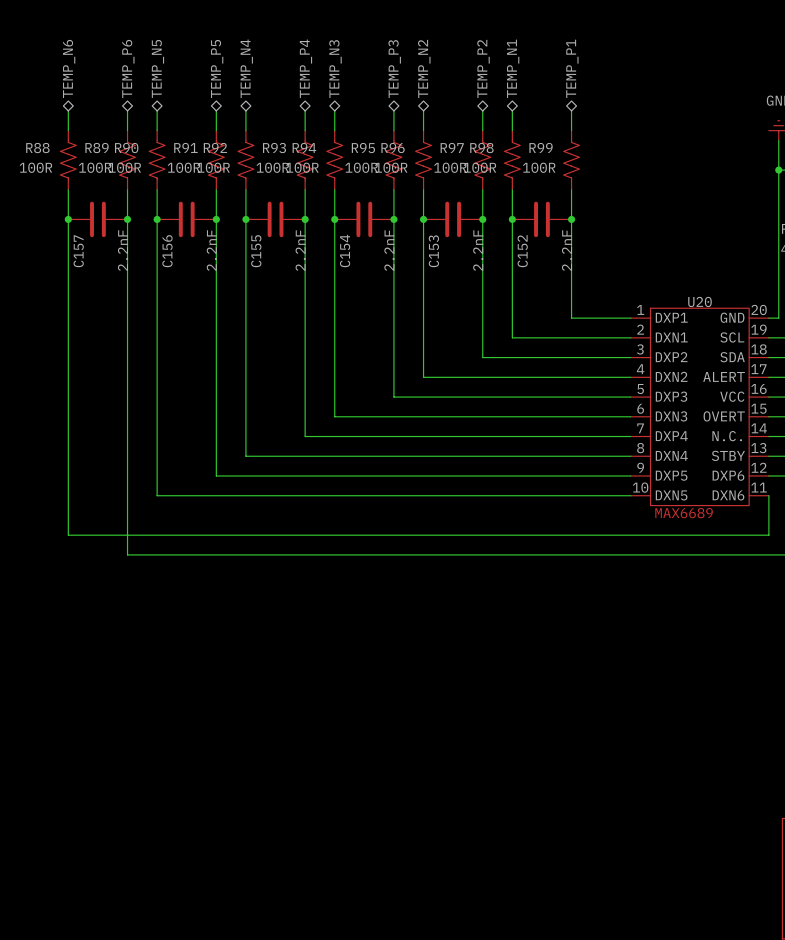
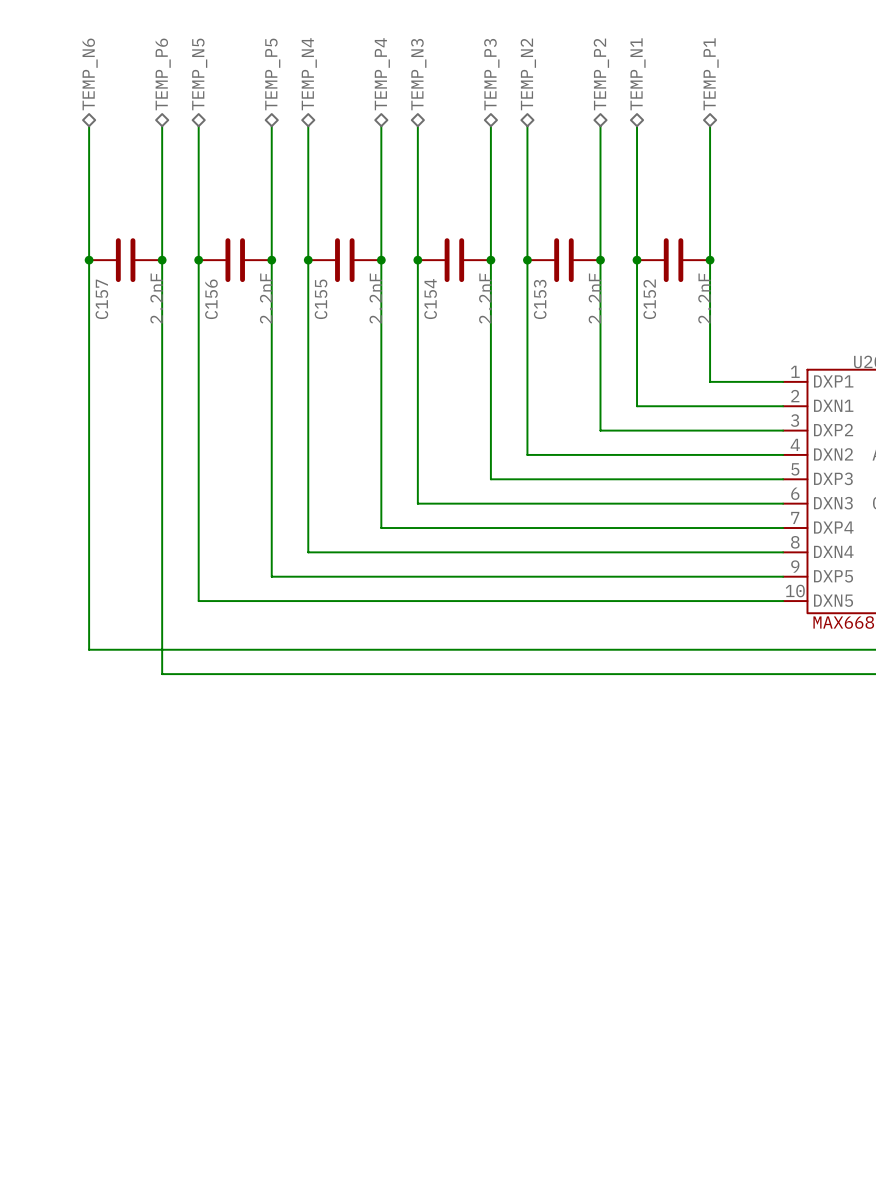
R88: 100R (68, 160) -> none
R89: 100R (127, 160) -> none
R90: 100R (157, 160) -> none
R91: 100R (216, 160) -> none
R92: 100R (245, 160) -> none
R93: 100R (305, 160) -> none
R94: 100R (334, 160) -> none
R95: 100R (393, 160) -> none
R96: 100R (423, 160) -> none
R97: 100R (482, 160) -> none
R98: 100R (512, 160) -> none
R99: 100R (571, 160) -> none

